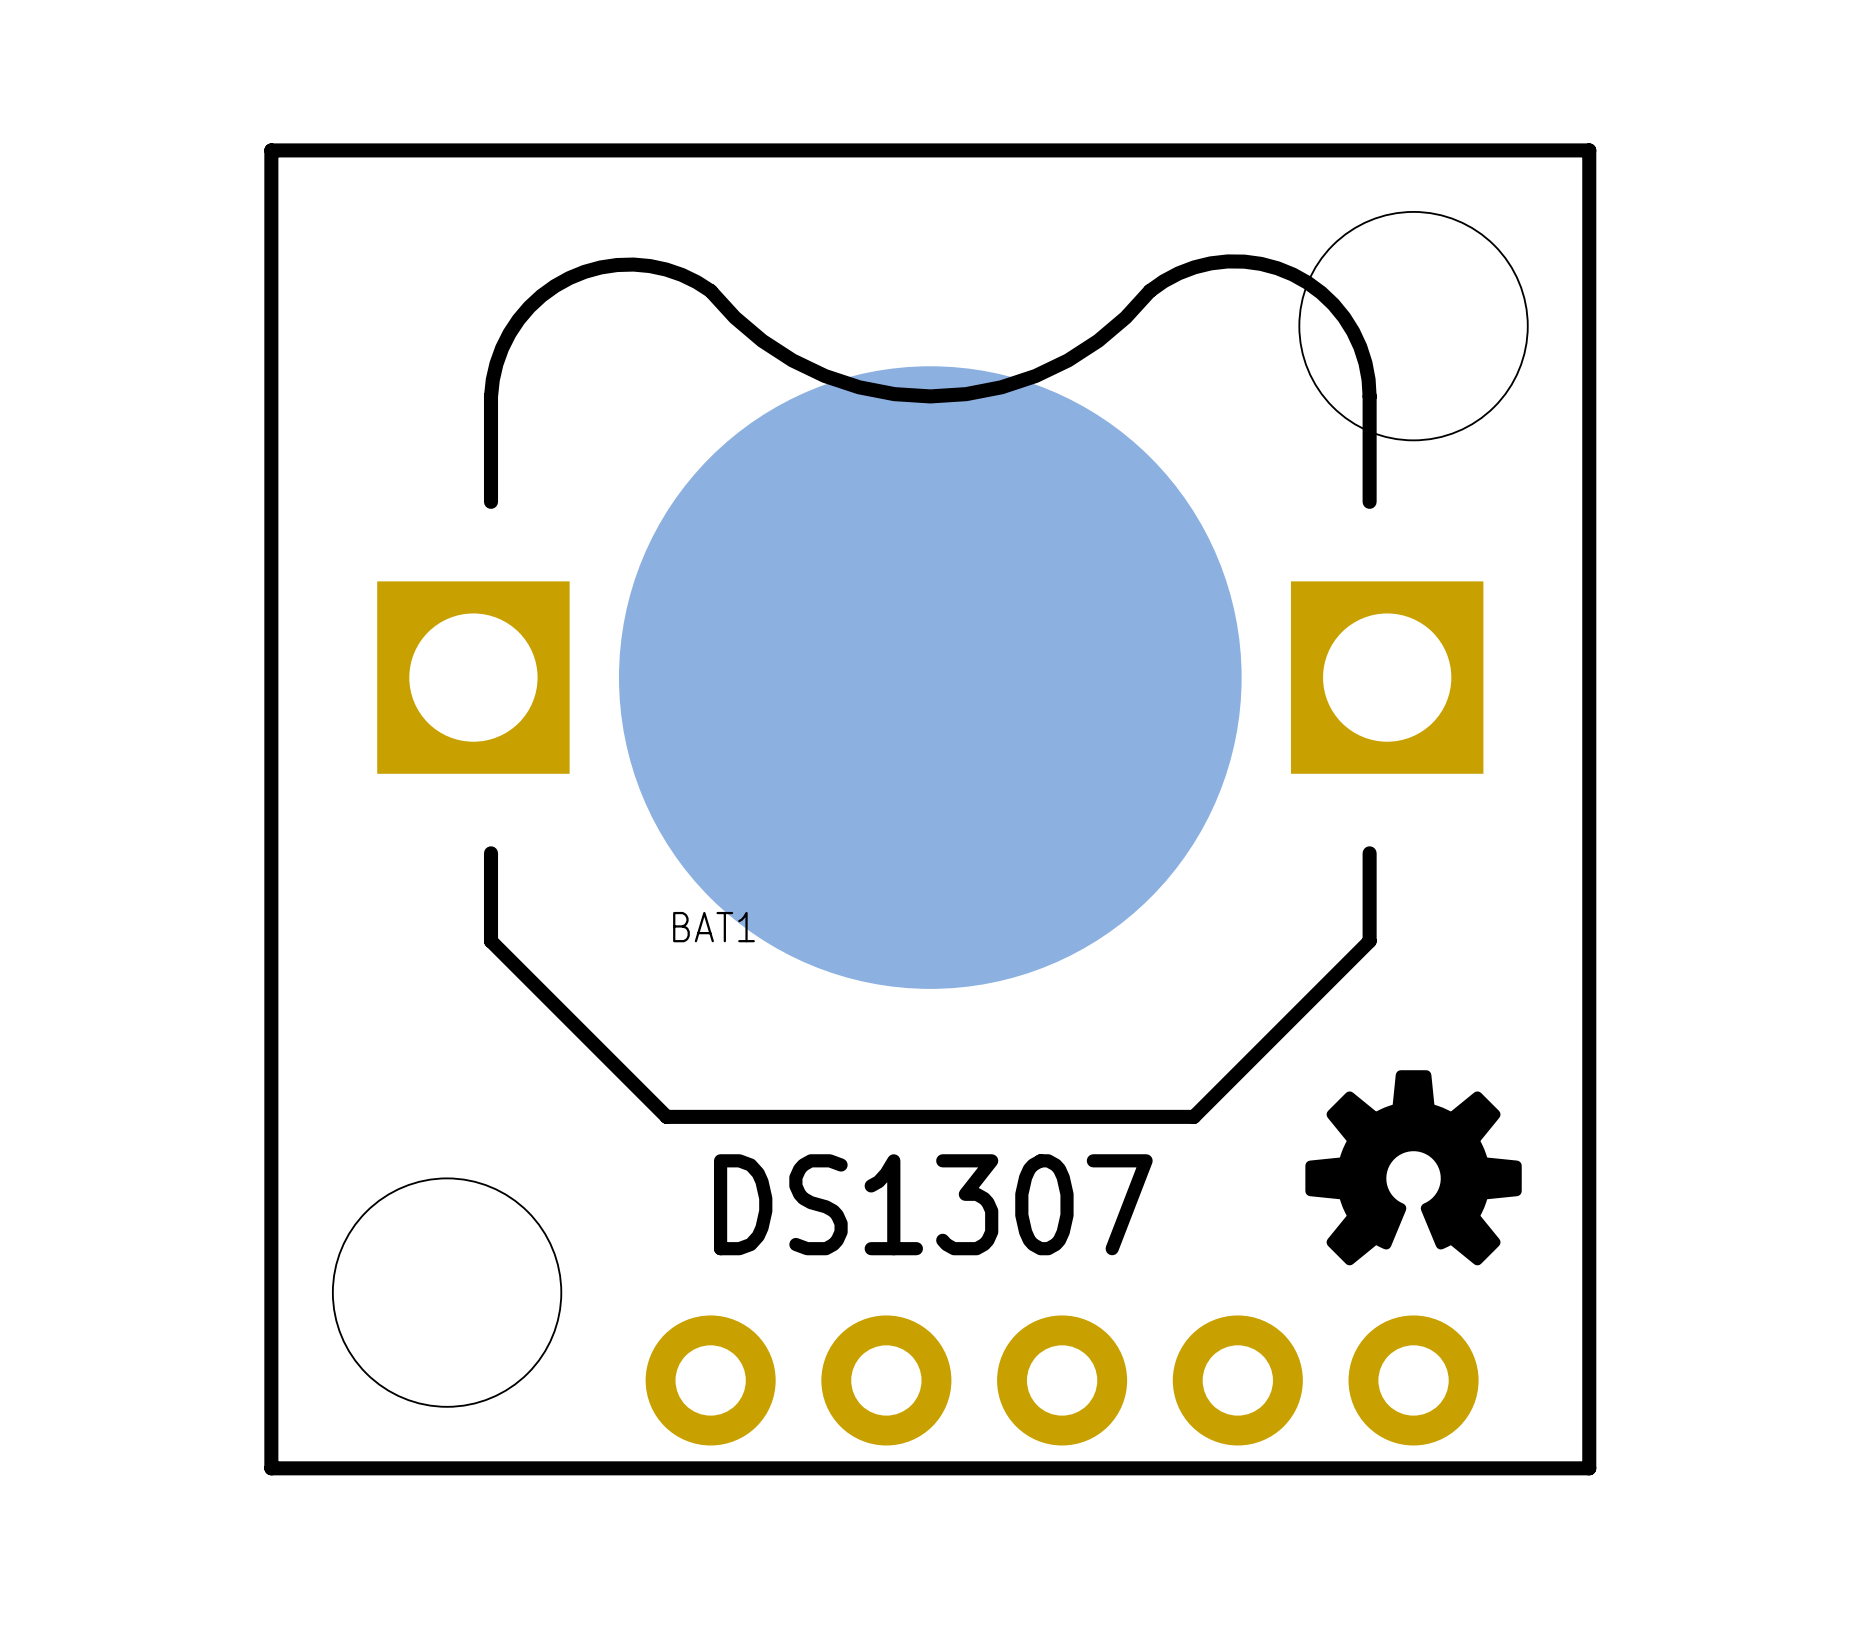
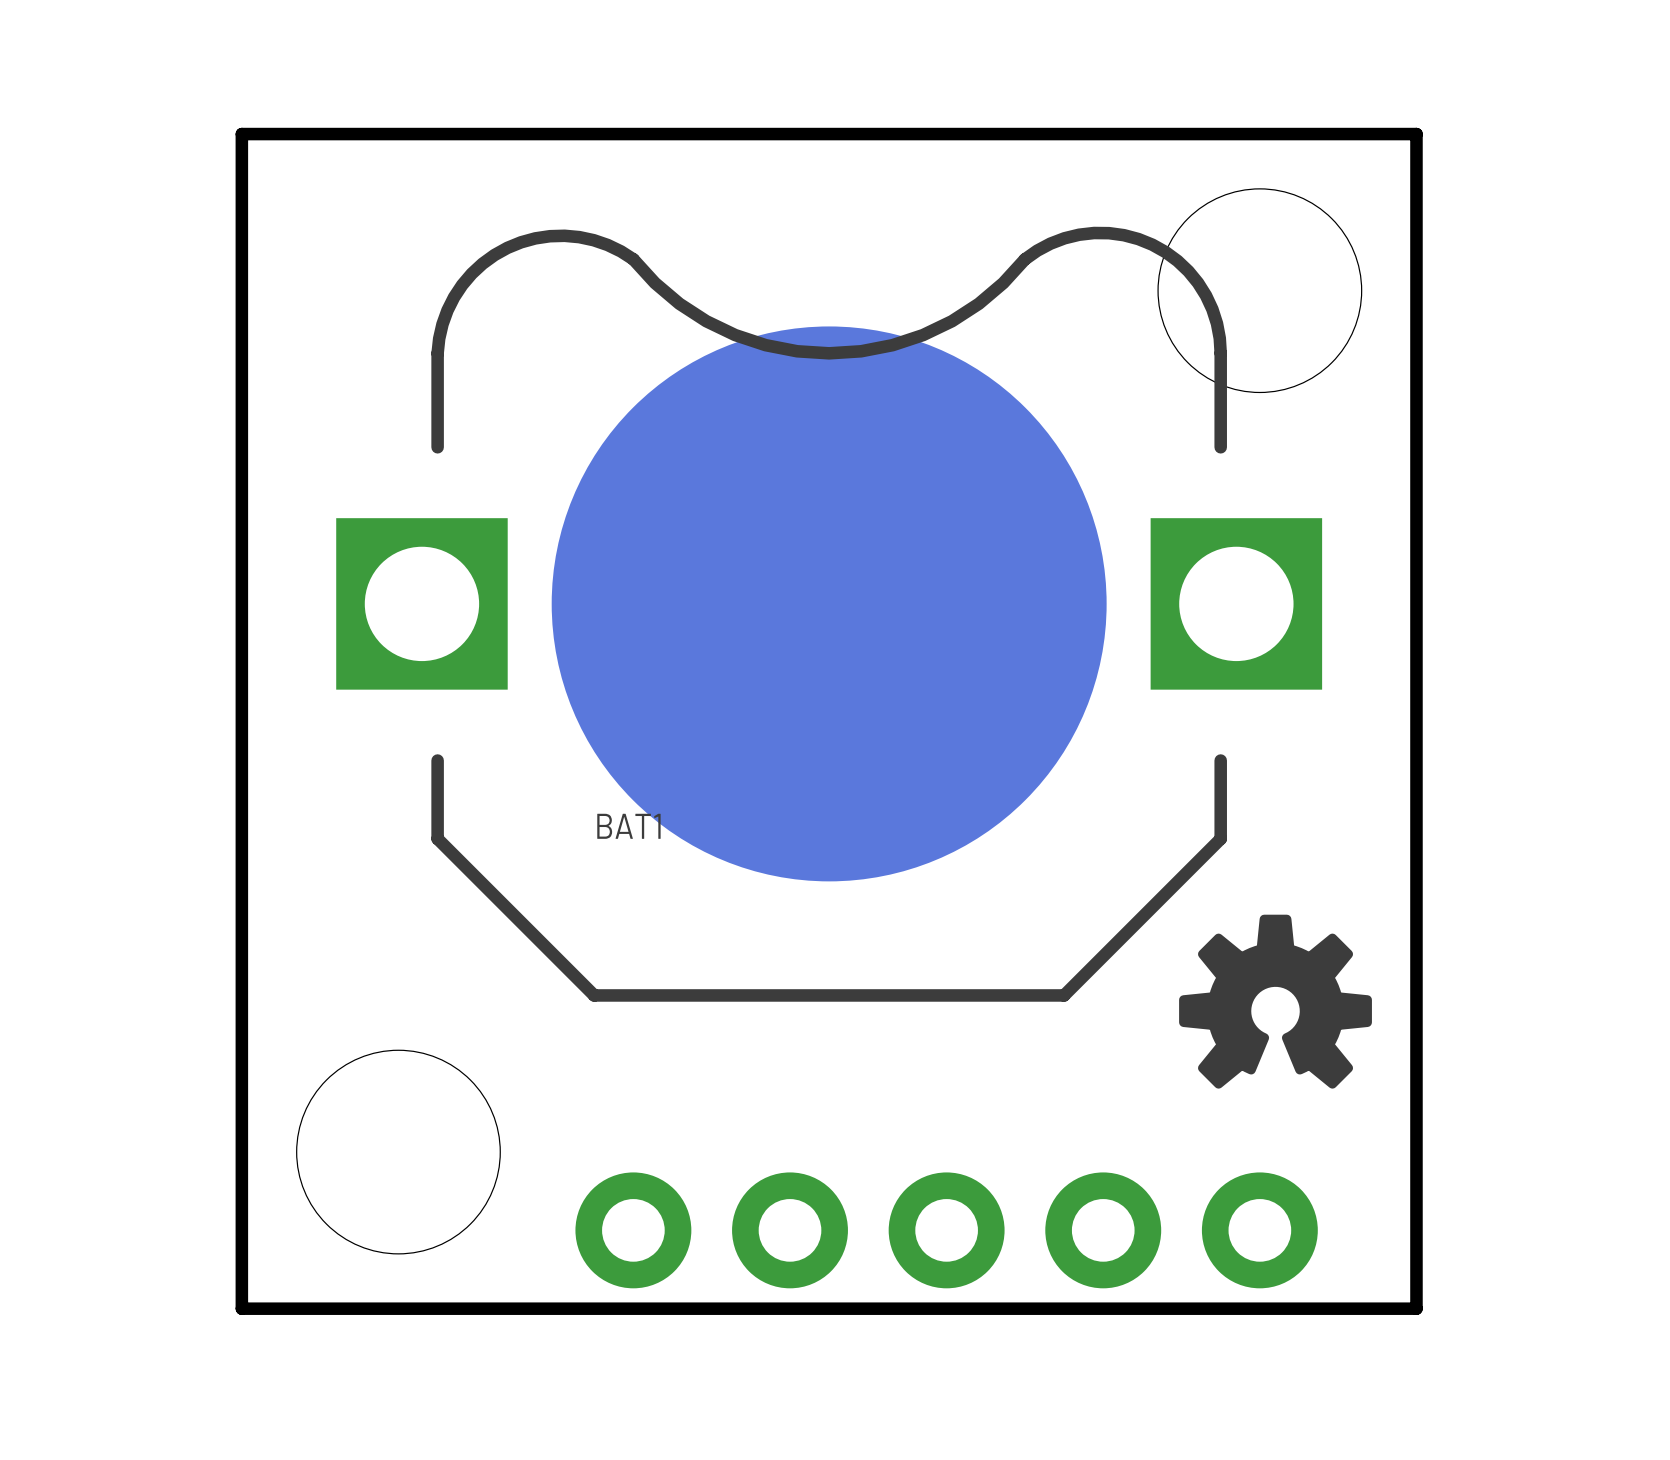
drawing position: (1413, 1167) -> (1275, 1001)
text: DS1307 (933, 1204) -> none

